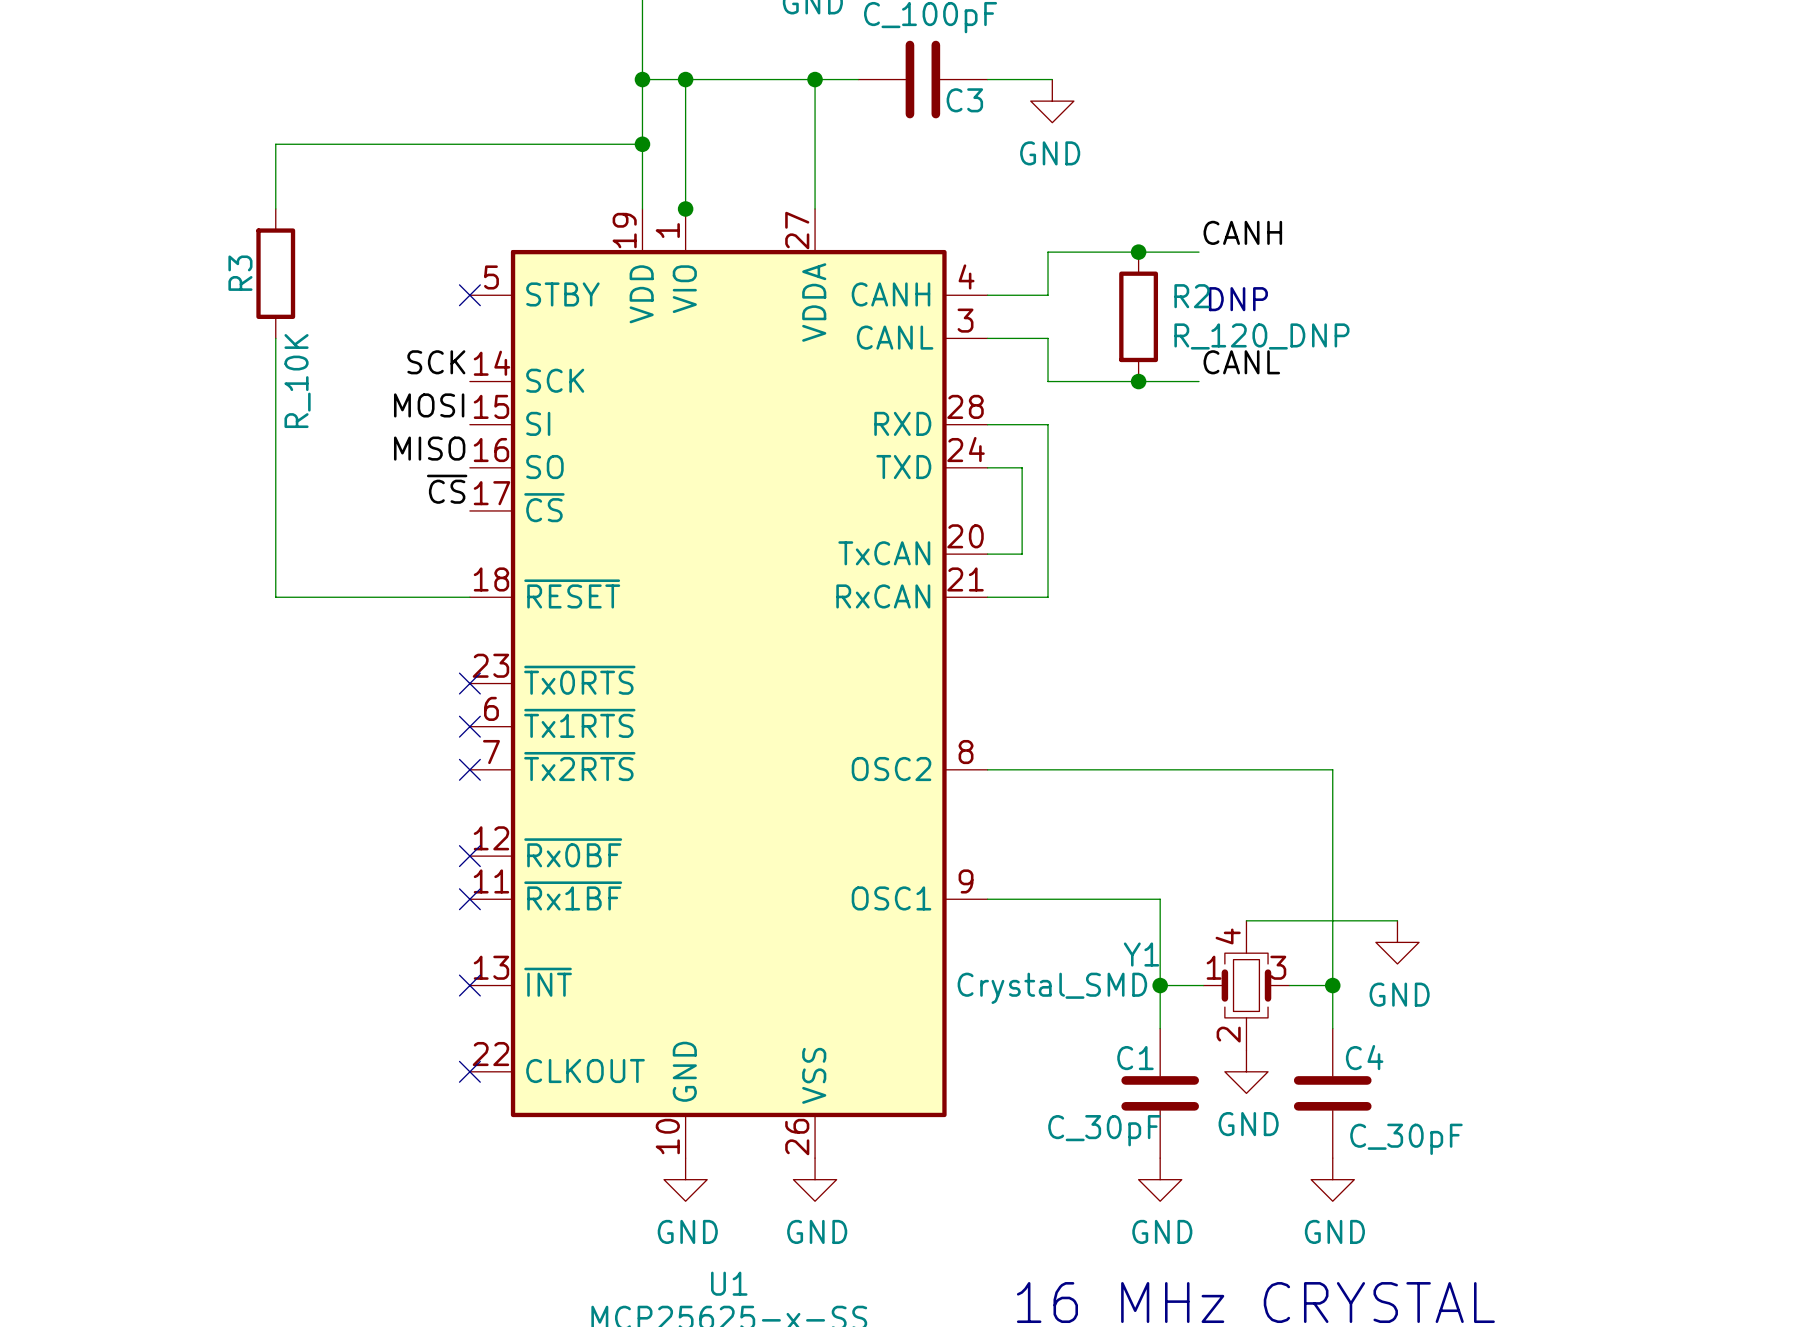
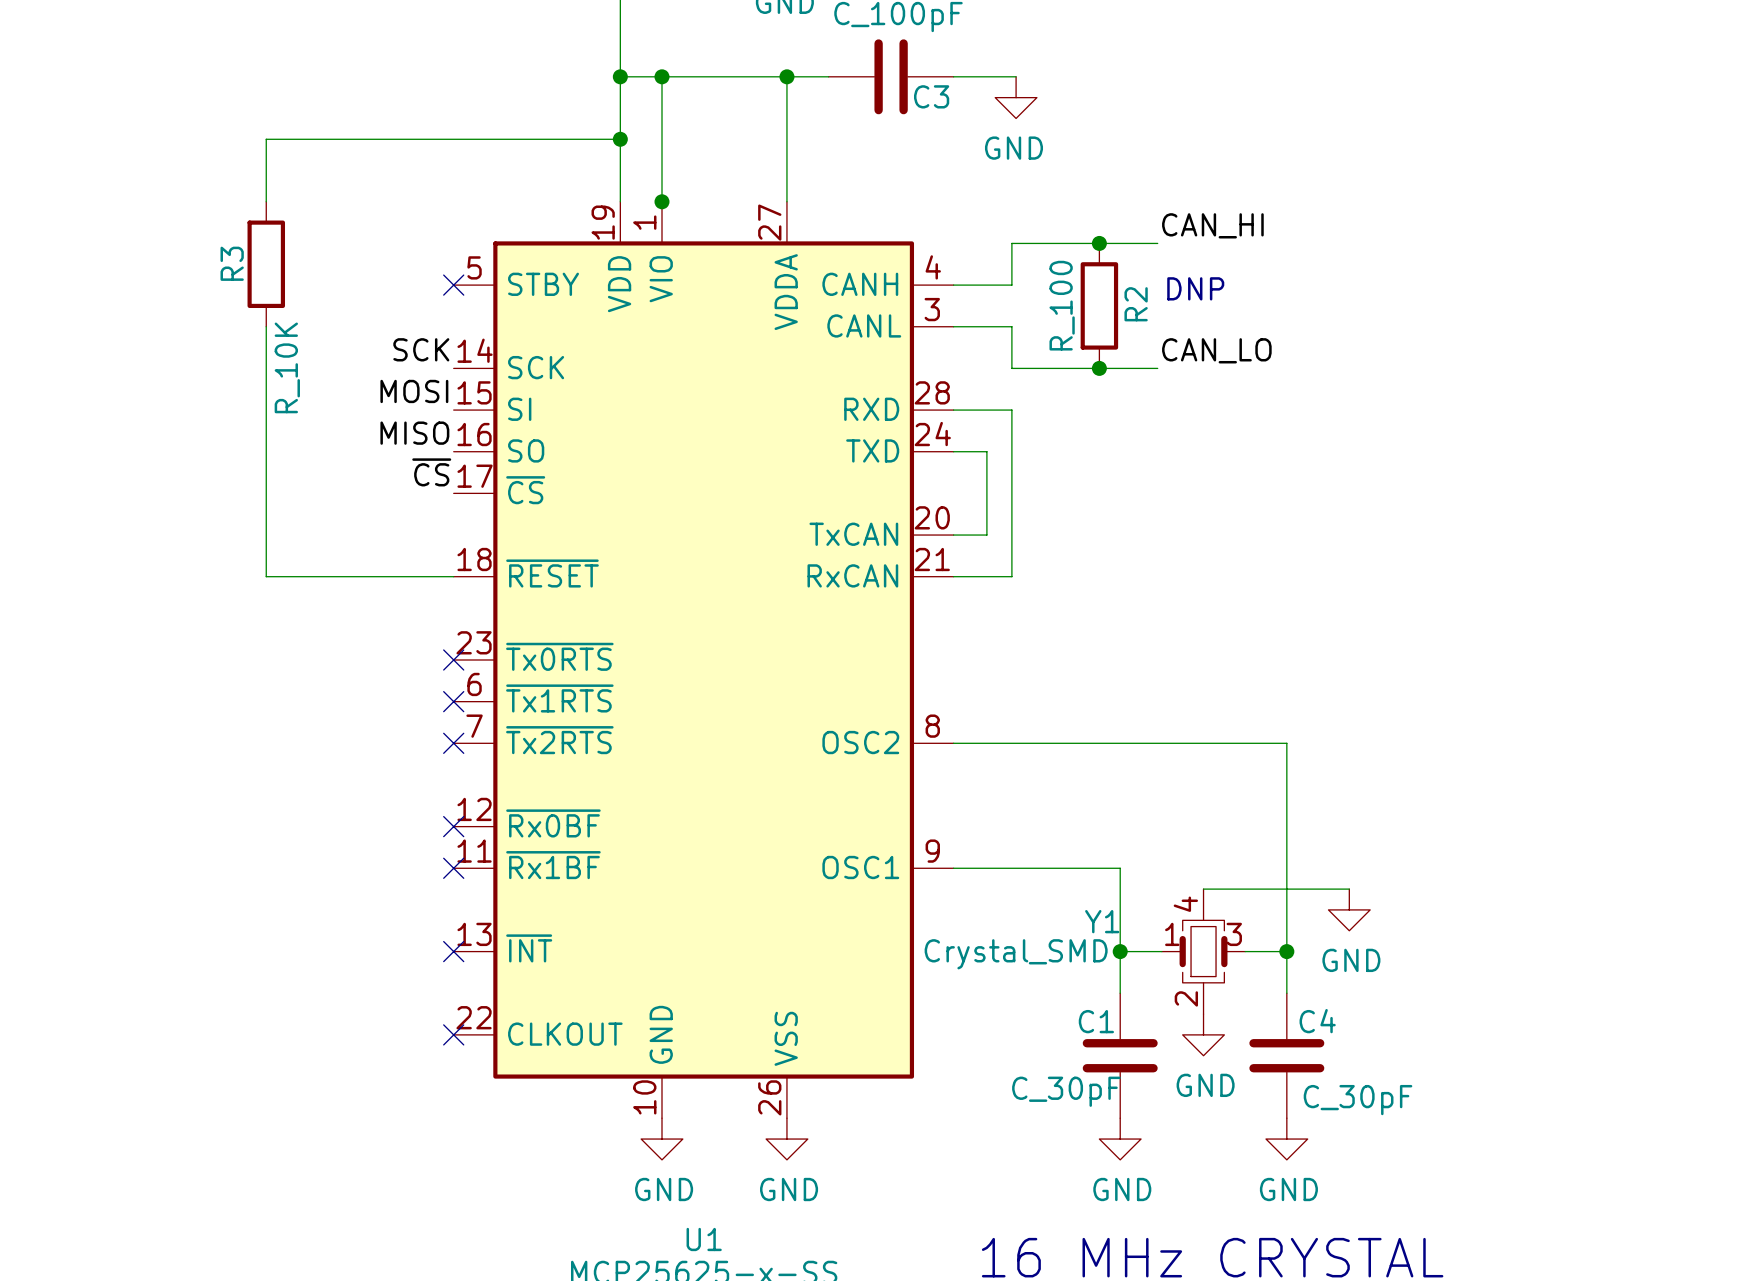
label: CANH (1242, 232) -> CAN_HI (1212, 225)
R2 name rotation: 0° (1192, 296) -> 90° counterclockwise (1136, 304)
R2 value: R_120_DNP (1261, 336) -> R_100 (1062, 305)
label: CANL (1241, 362) -> CAN_LO (1216, 350)

